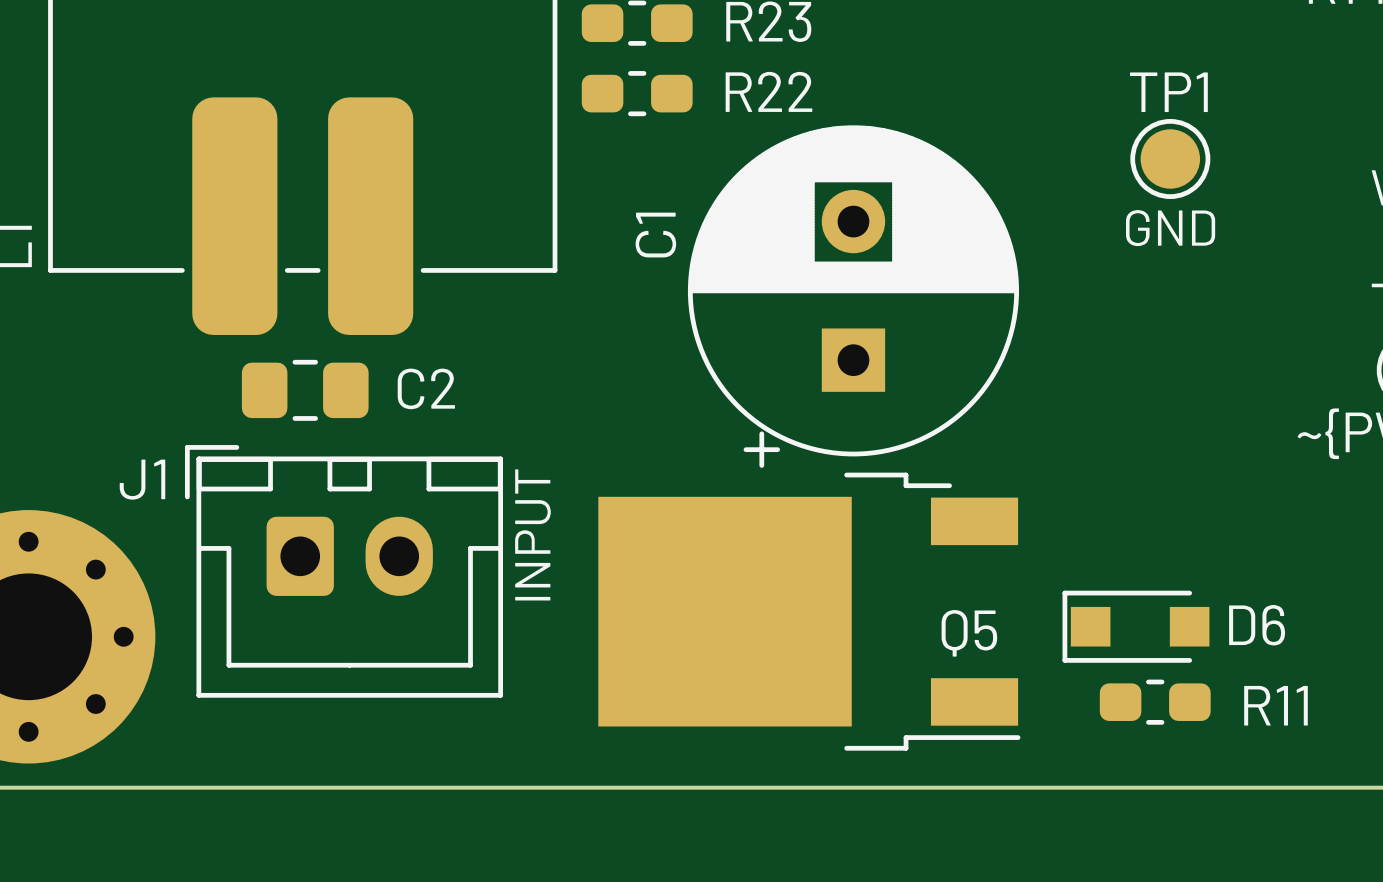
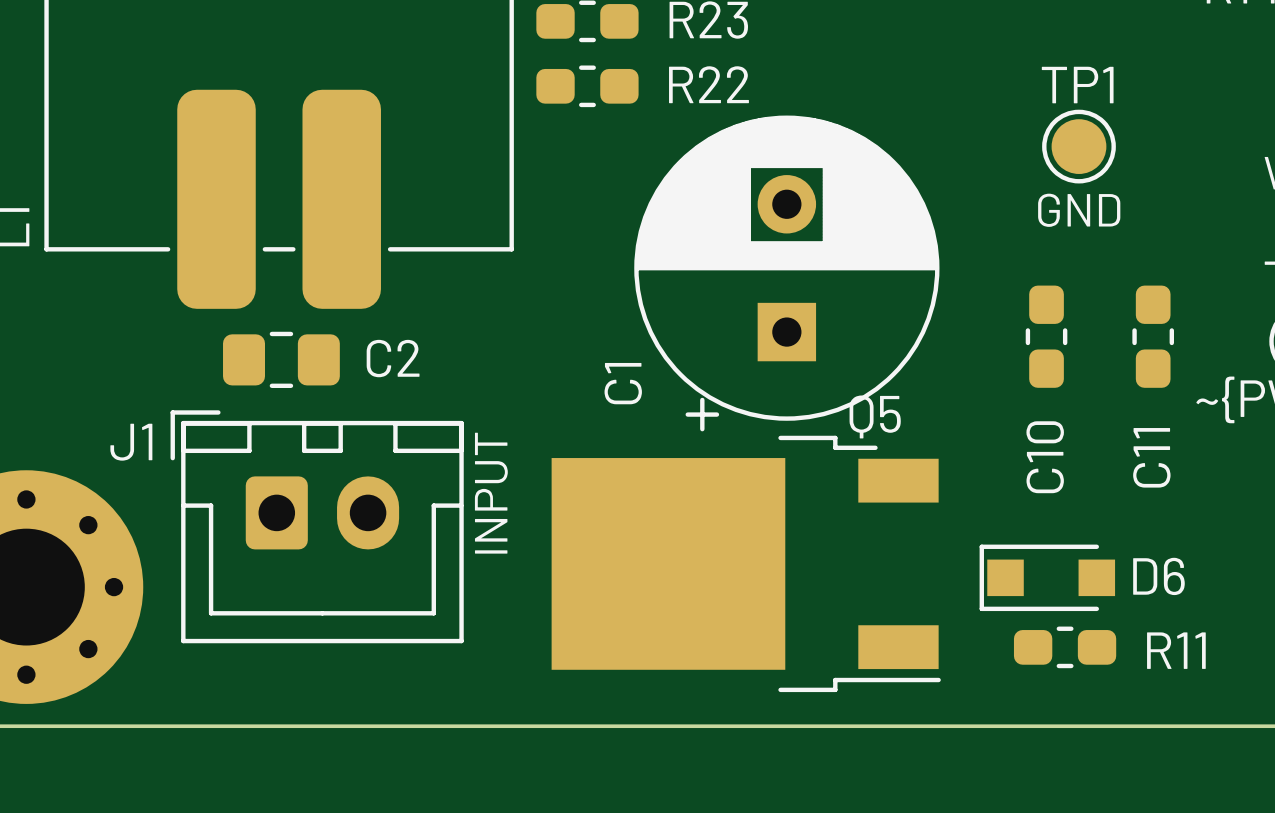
C1 name position: C1 (655, 235) -> C1 (623, 383)
C10: none -> (1046, 336)
C11: none -> (1153, 336)
Q5 name position: Q5 (969, 633) -> Q5 (875, 416)

